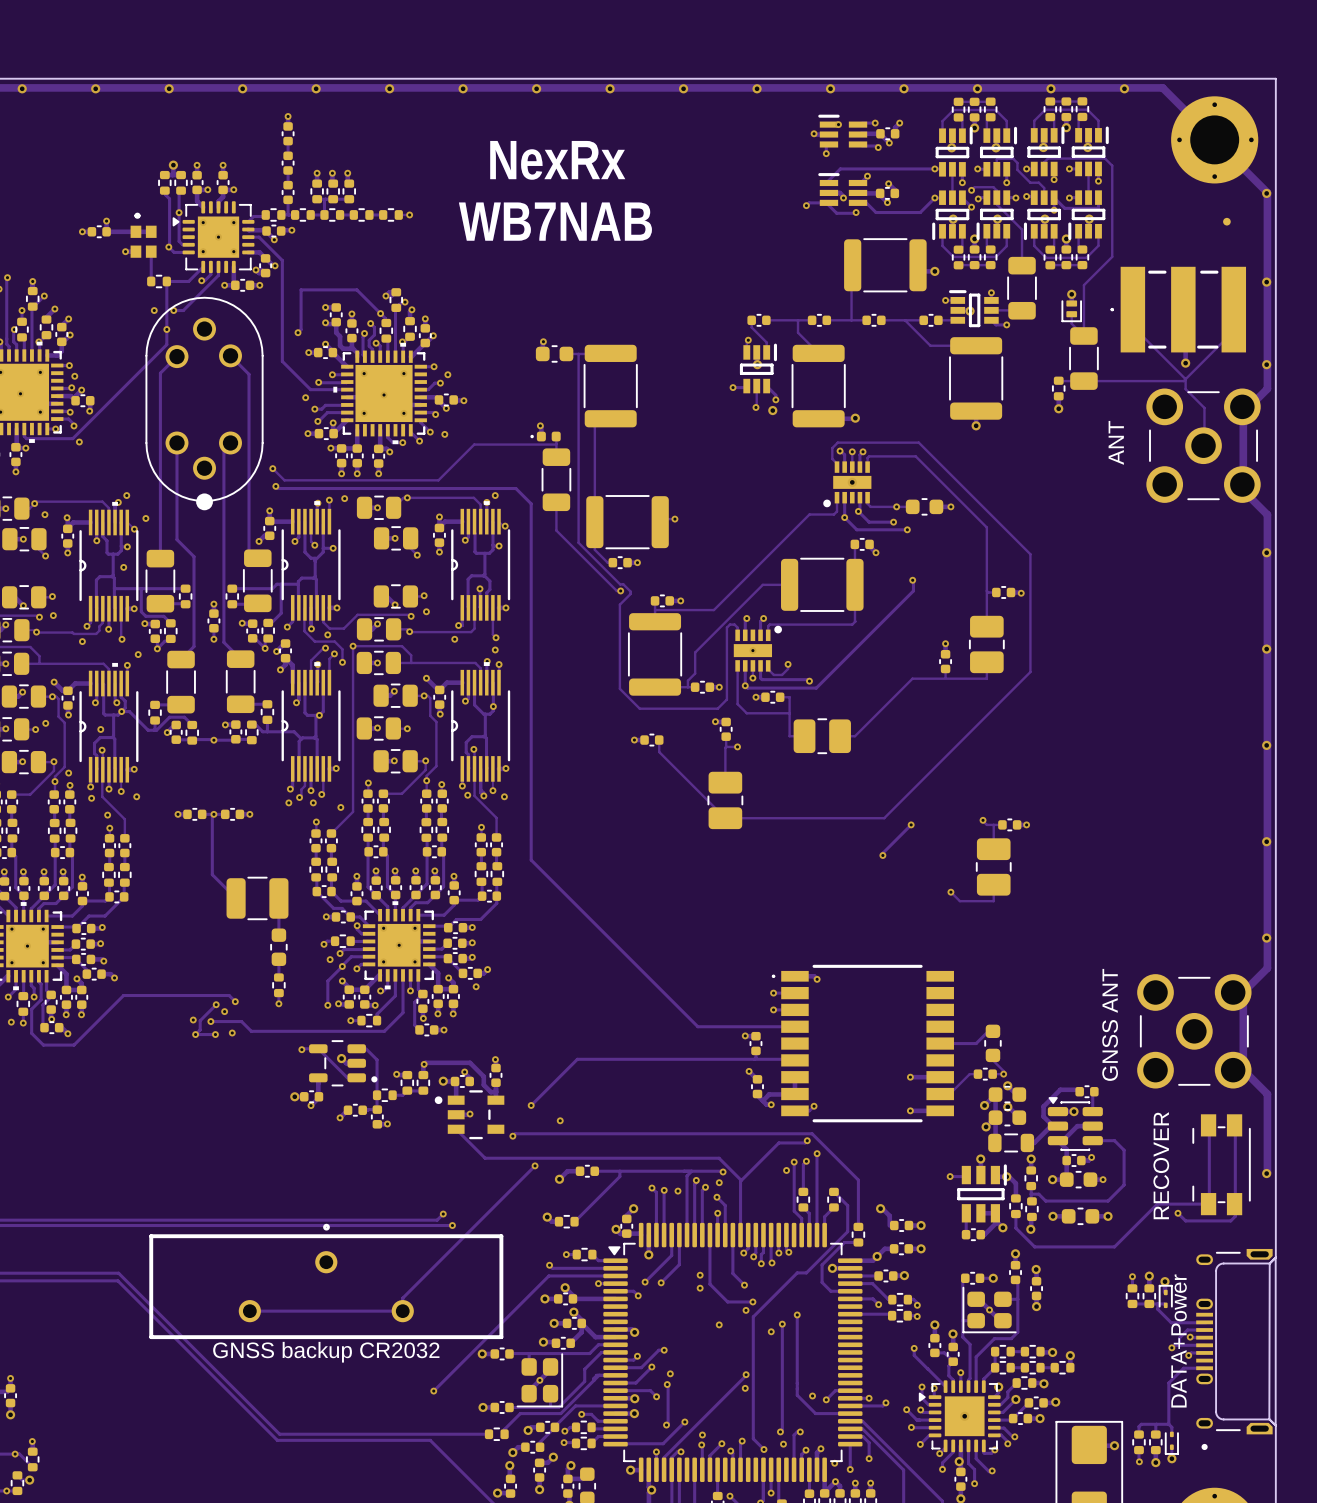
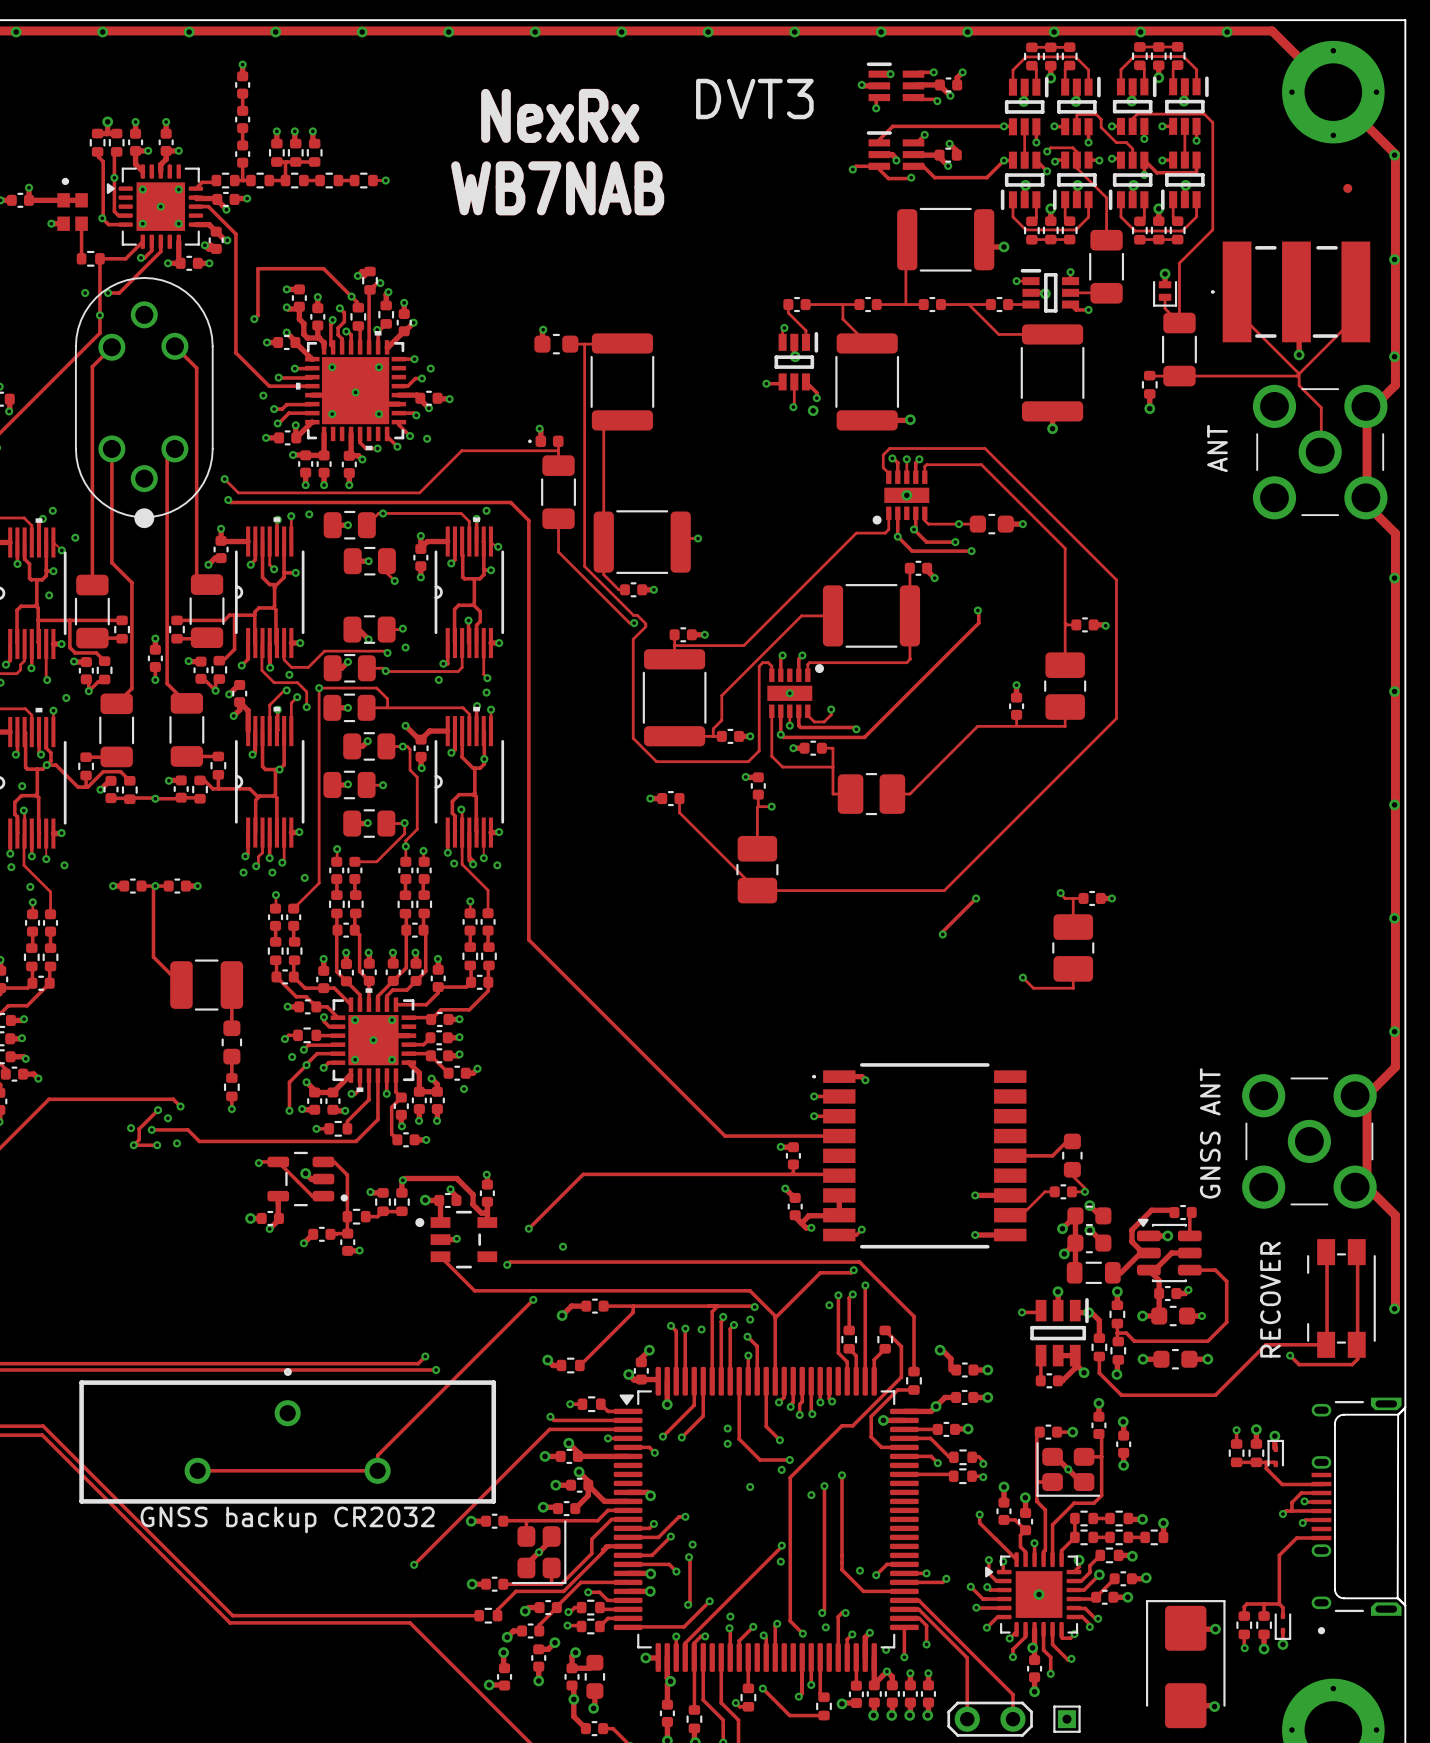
text: none -> DVT3 (754, 99)
part text: DATA+Power (1179, 1340) -> none

